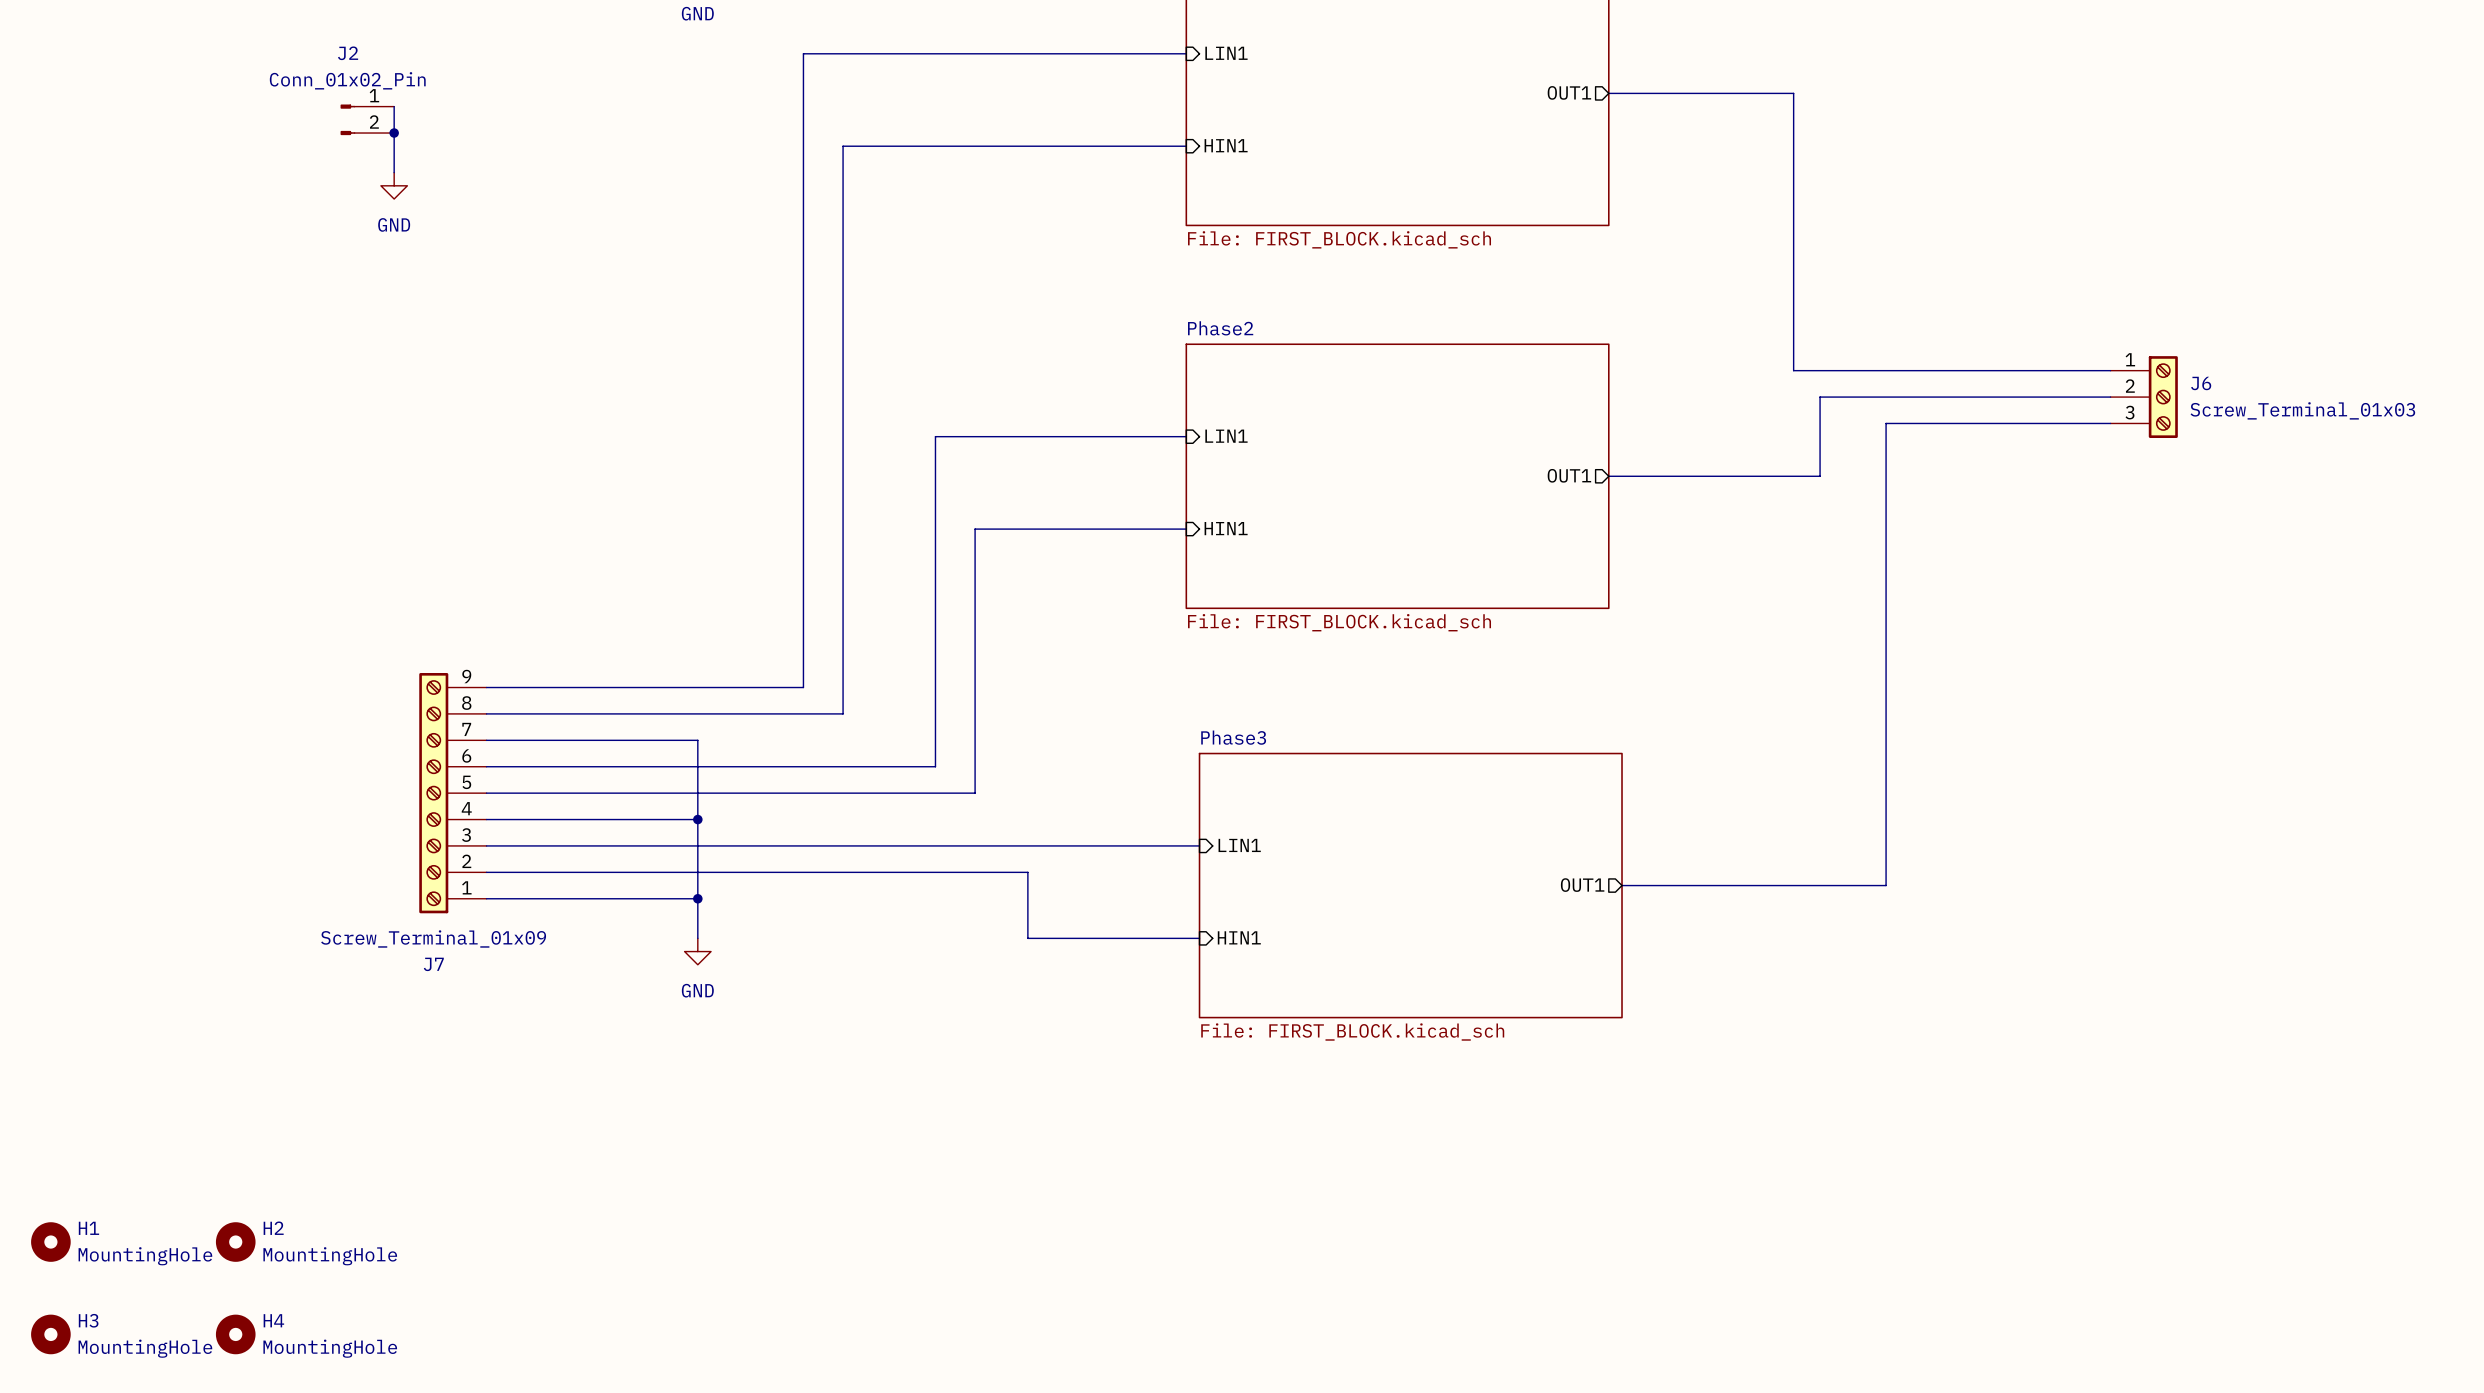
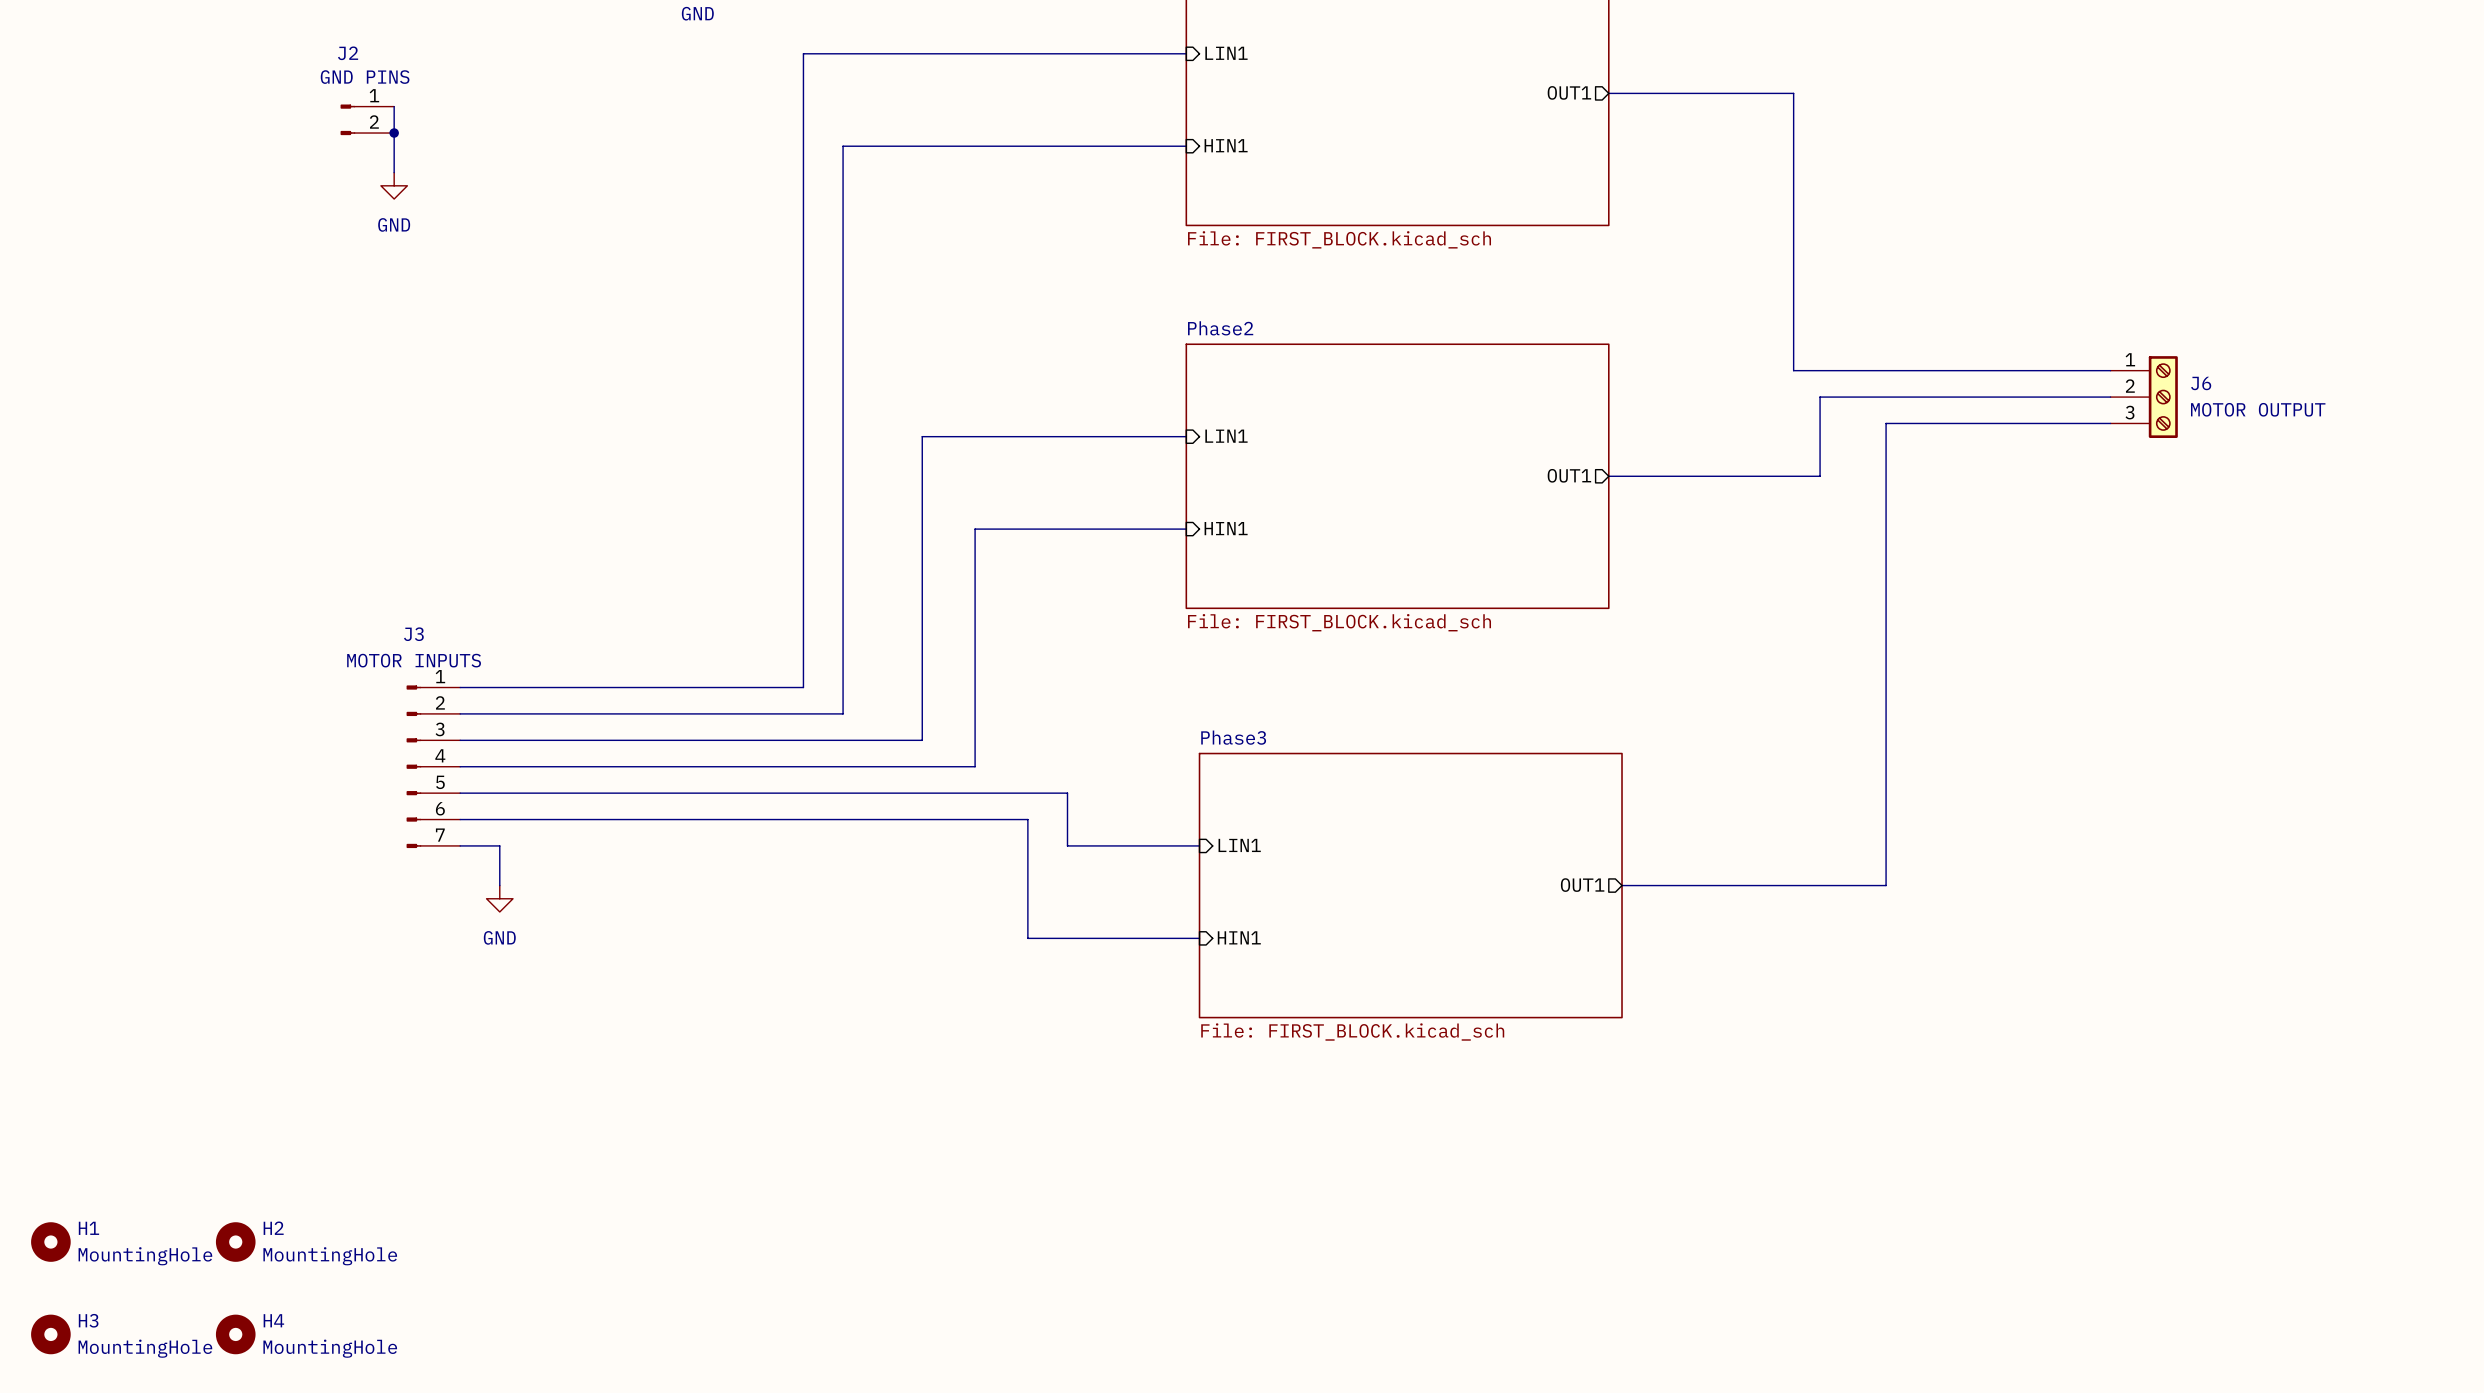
J2 value: Conn_01x02_Pin (347, 80) -> GND PINS (365, 77)
J6 value: Screw_Terminal_01x03 (2302, 410) -> MOTOR OUTPUT (2258, 409)
wire: (935, 436) (935, 766) -> (935, 436) (922, 436) (922, 740) (697, 740)
wire: (697, 740) (697, 938) -> none
J3: none -> MOTOR INPUTS (433, 766)
wire: (975, 766) (975, 793) -> (975, 766) (935, 766)
J7: Screw_Terminal_01x09 (452, 793) -> none
junction: (697, 819) -> none
wire: (499, 845) (1067, 845) -> (975, 793) (1067, 793) (1067, 845)
wire: none -> (499, 845) (499, 885)
wire: (486, 872) (1027, 872) -> (697, 819) (1027, 819) (1027, 872)
wire: (486, 898) (697, 898) -> none
junction: (697, 898) -> none
power symbol position: GND (697, 951) -> GND (499, 898)

